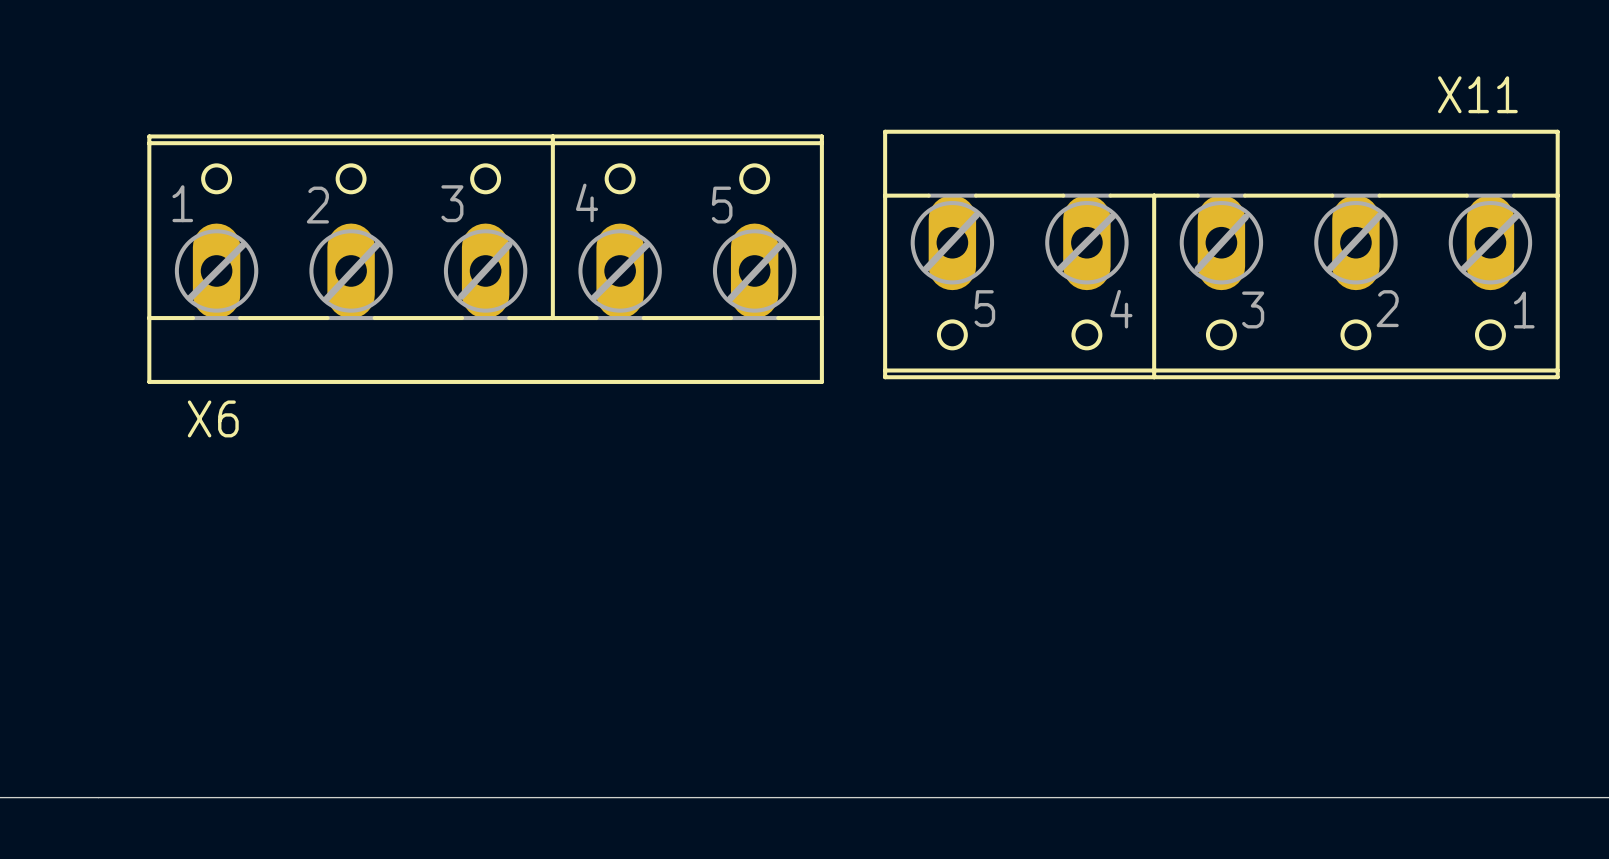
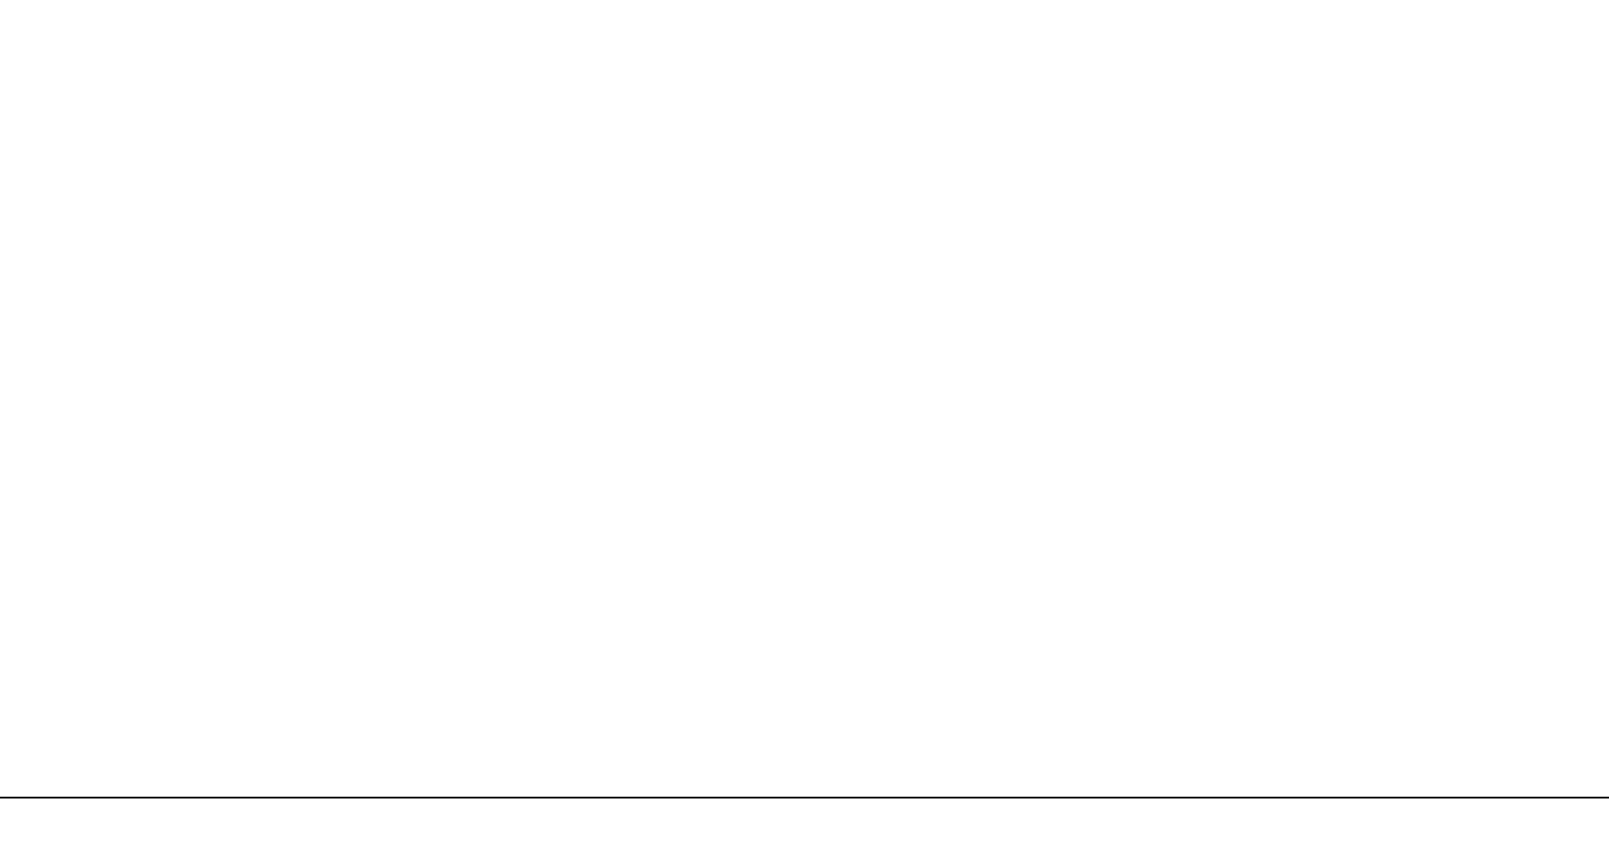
X11: (1221, 254) -> none
X6: (485, 259) -> none

